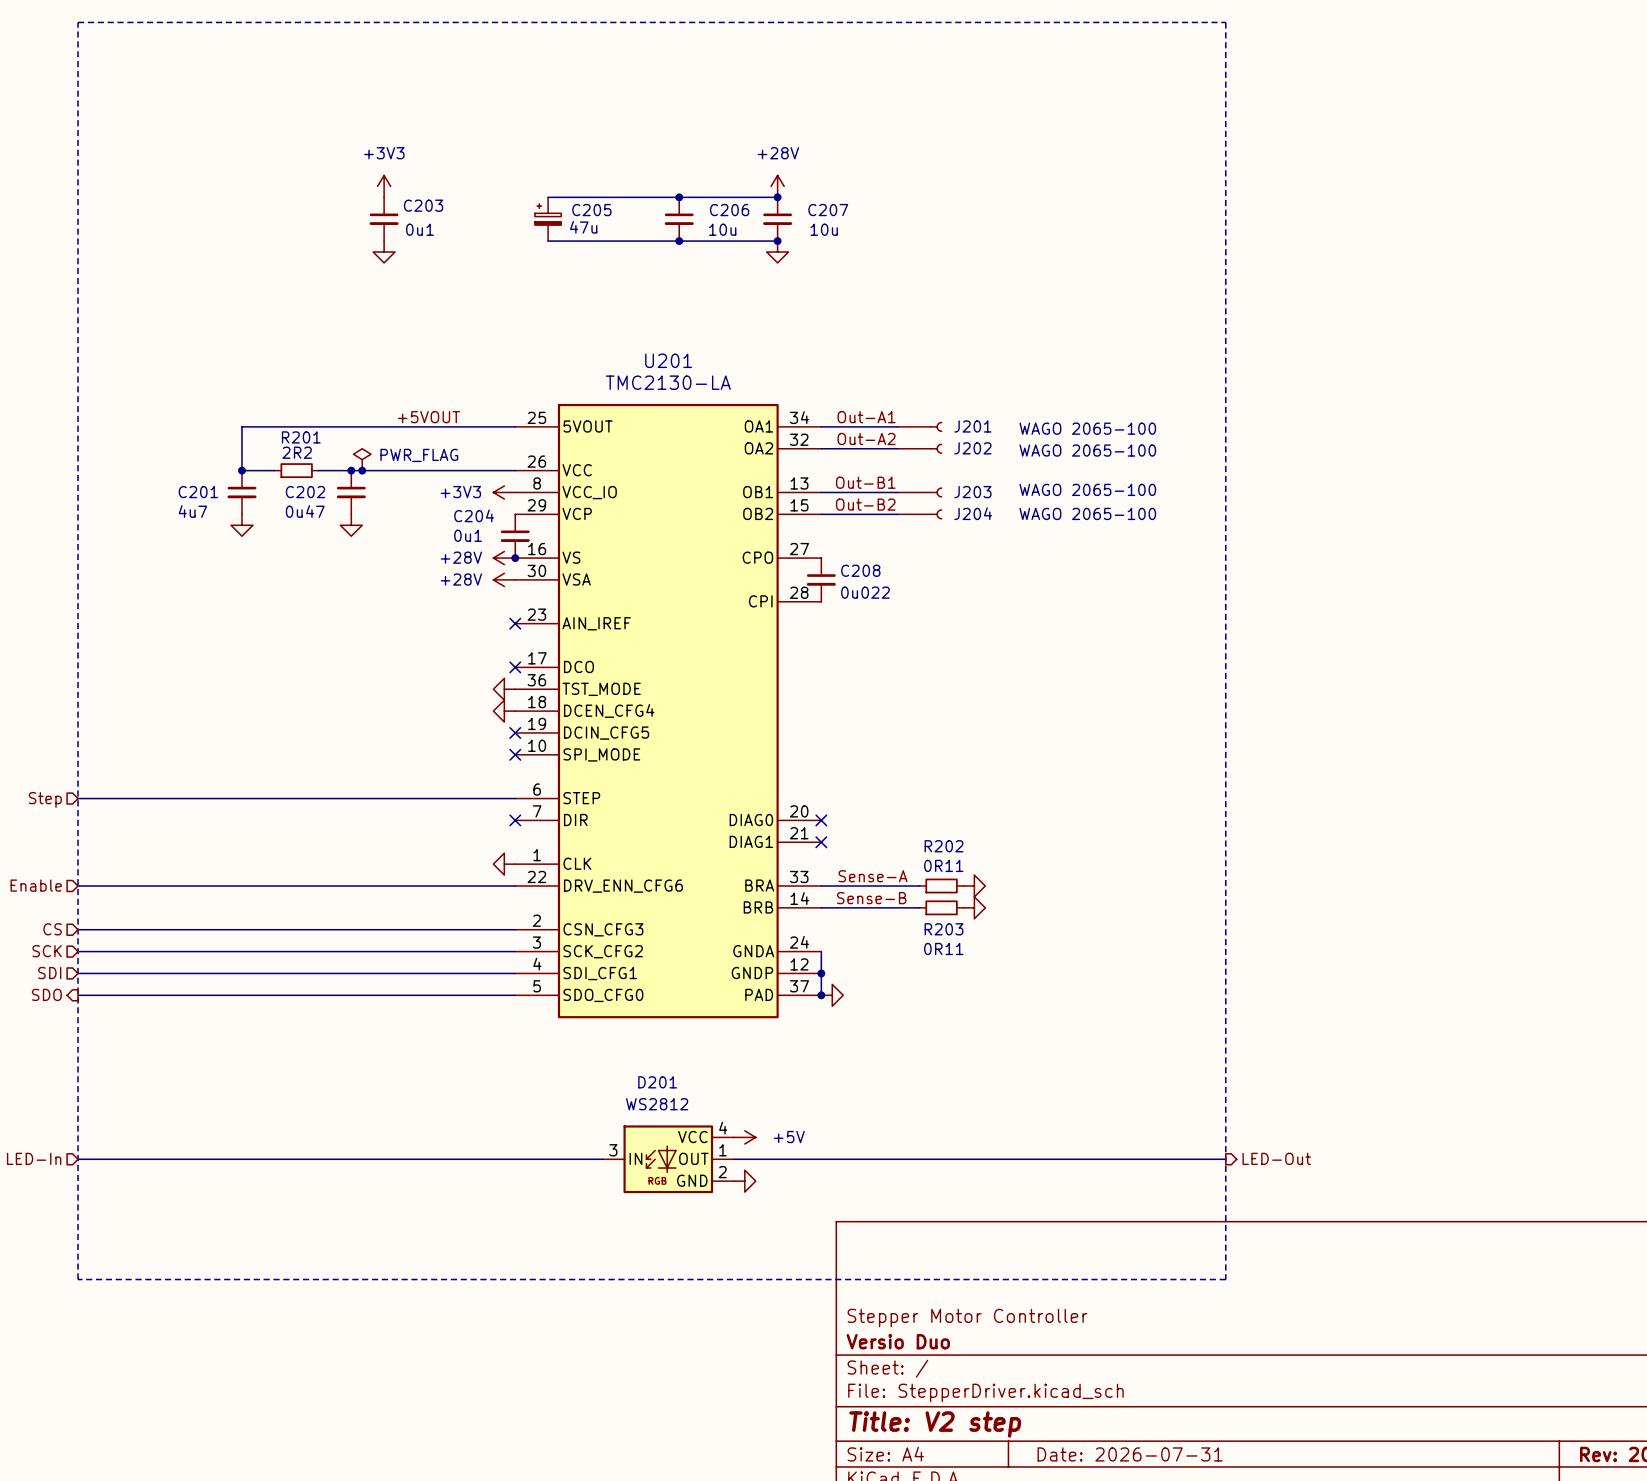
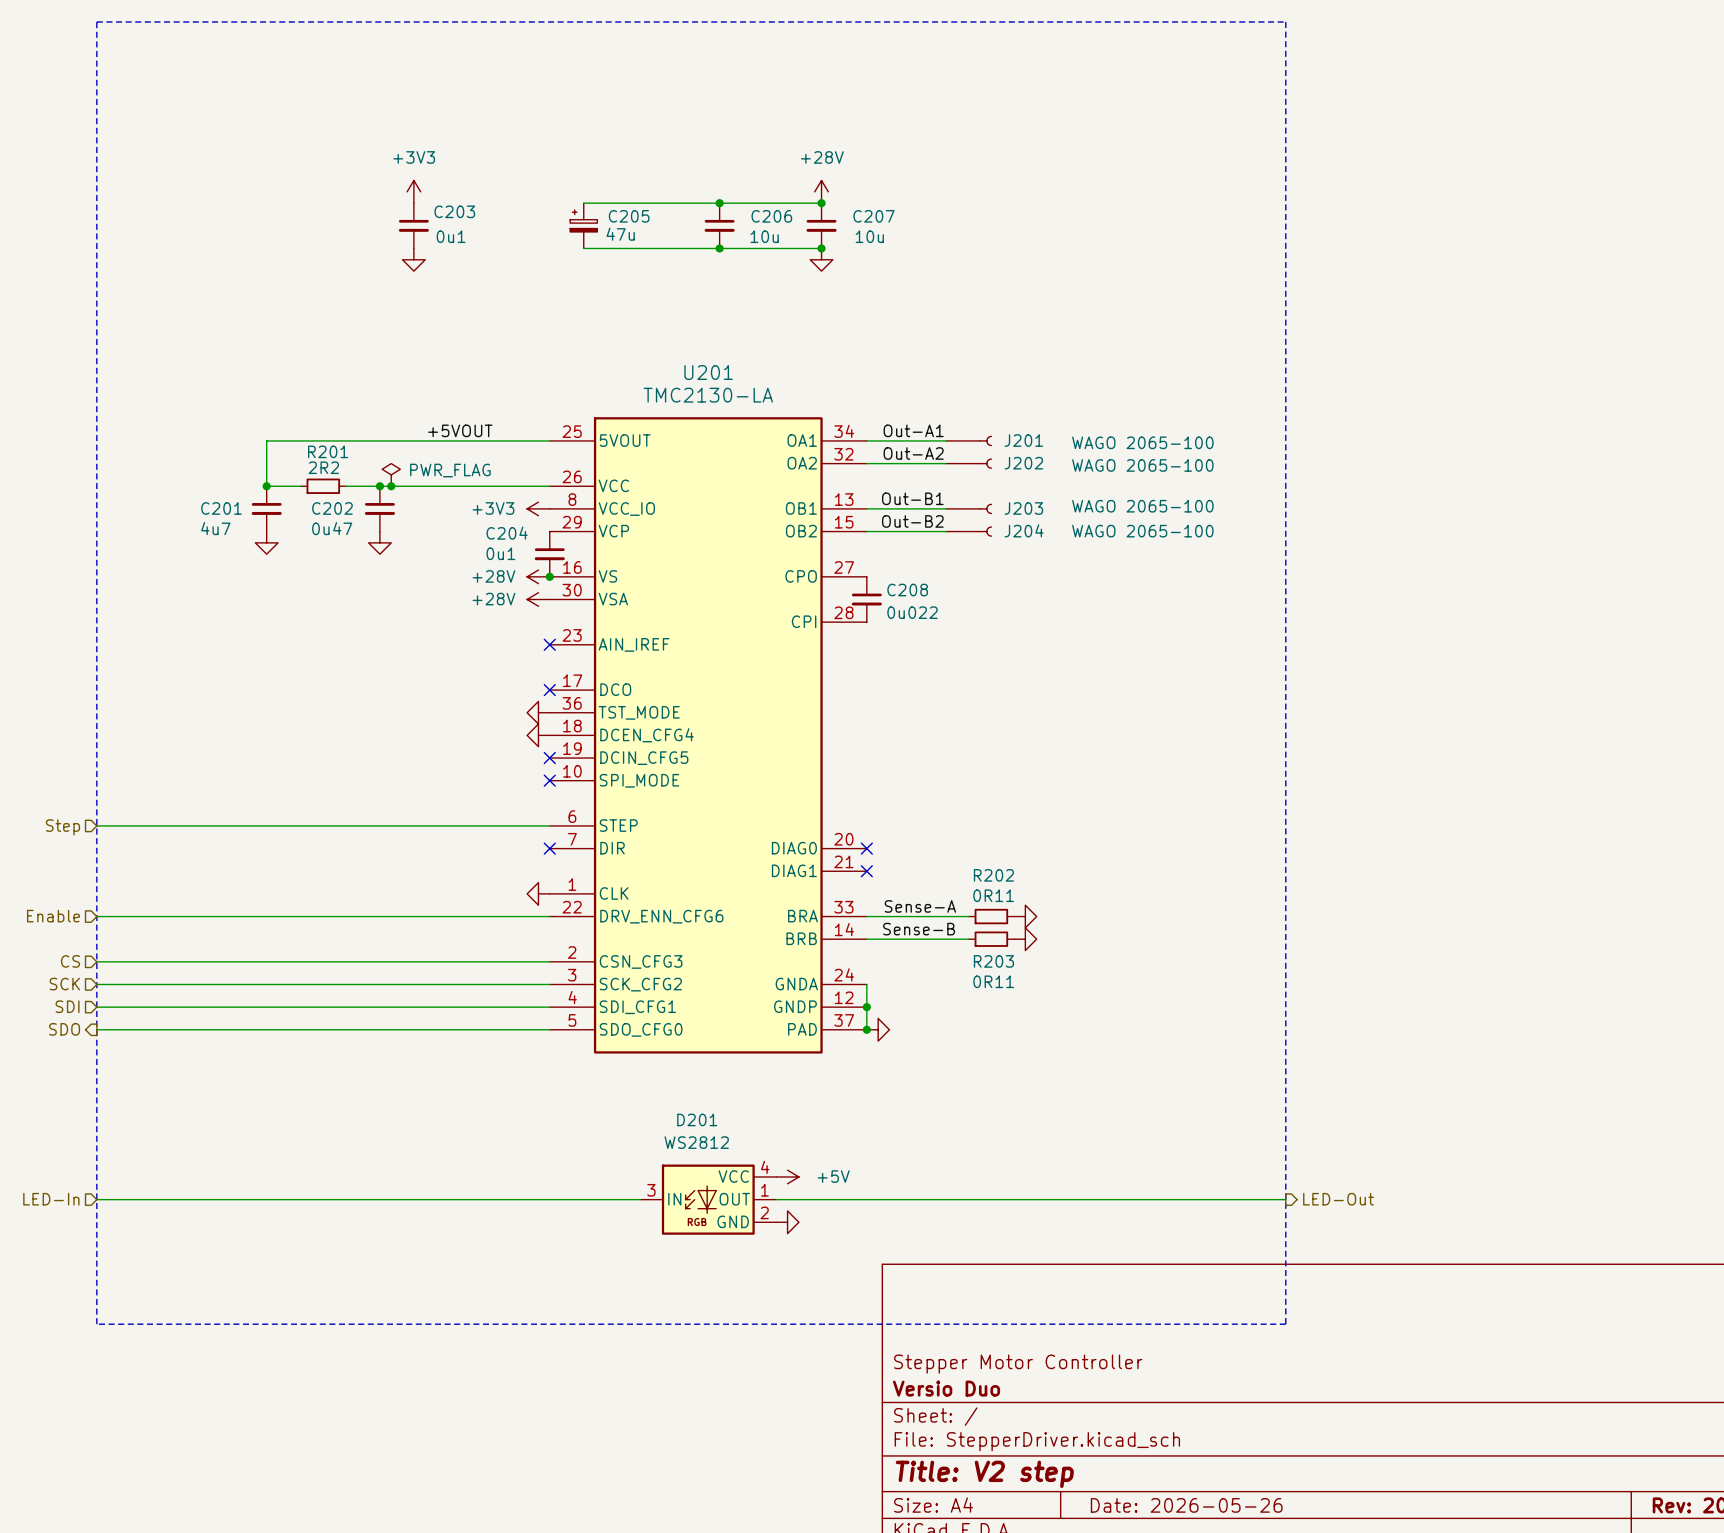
title block: Date: 2026-07-31 (1130, 1454) -> Date: 2026-05-26 (1186, 1505)

